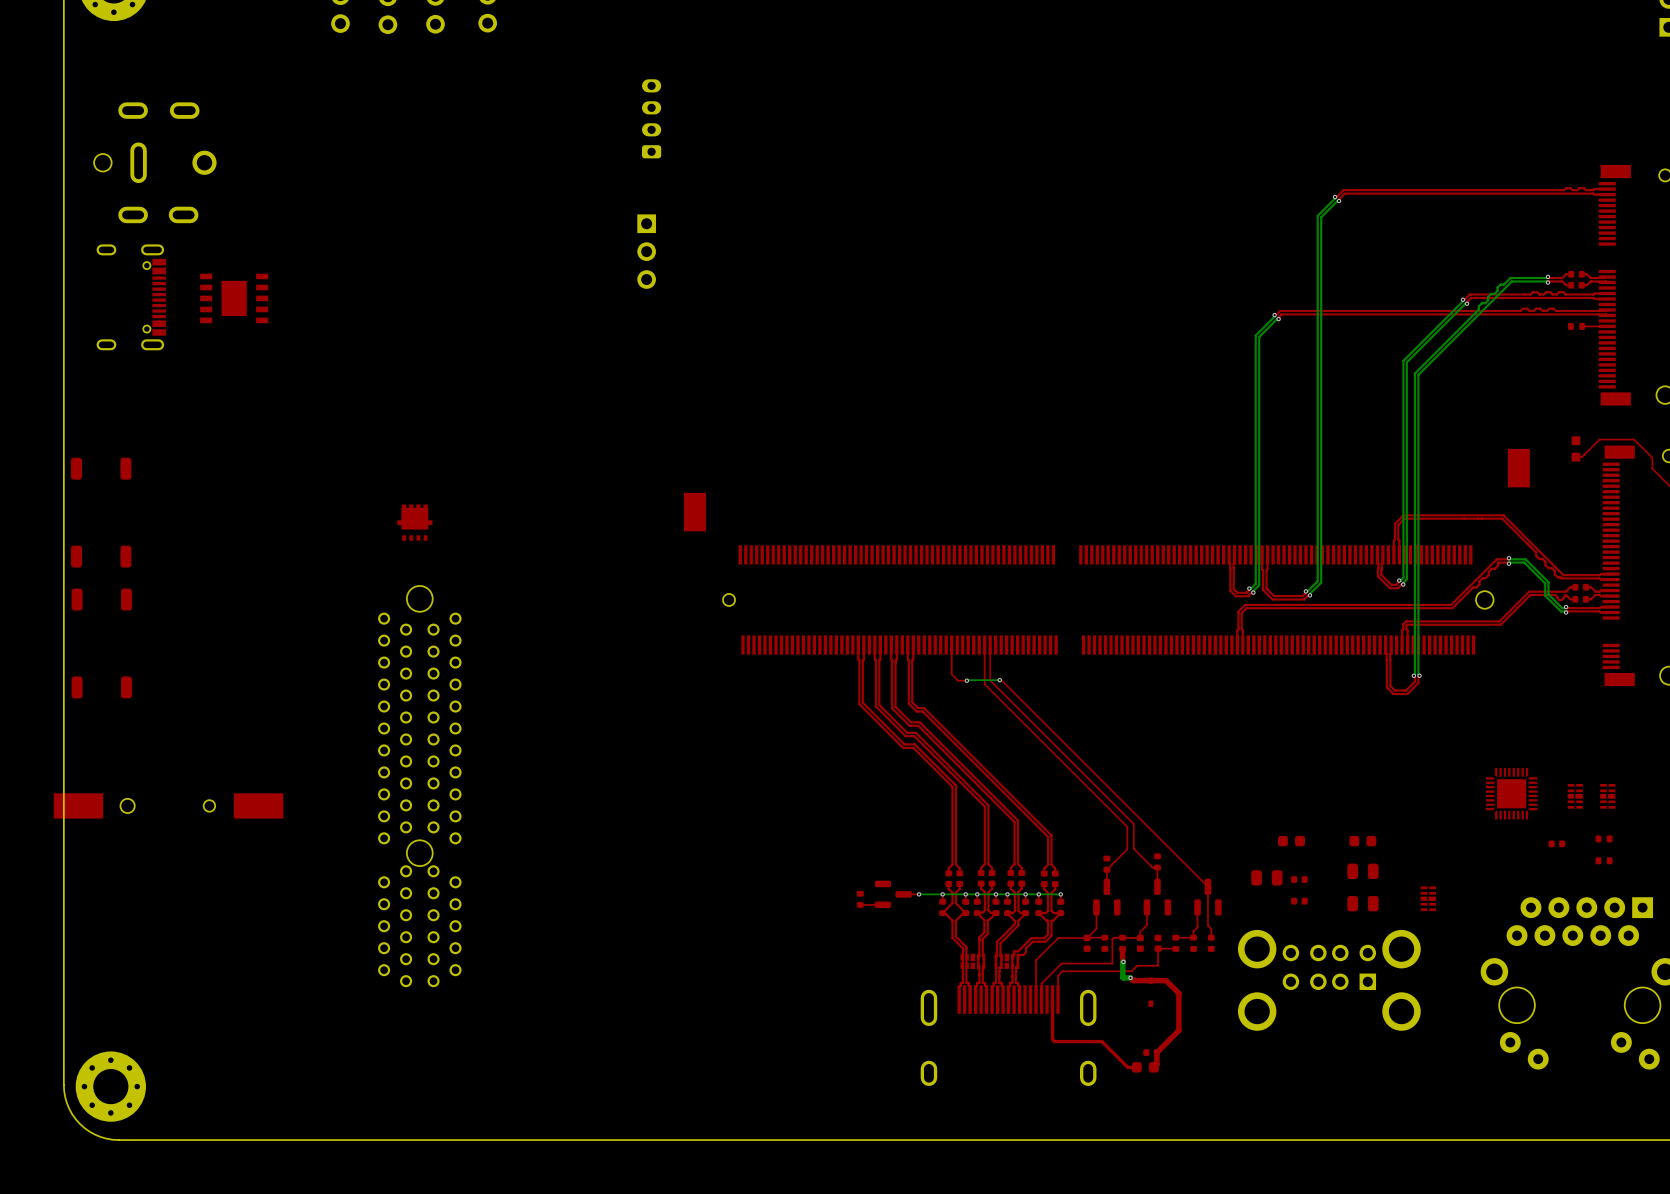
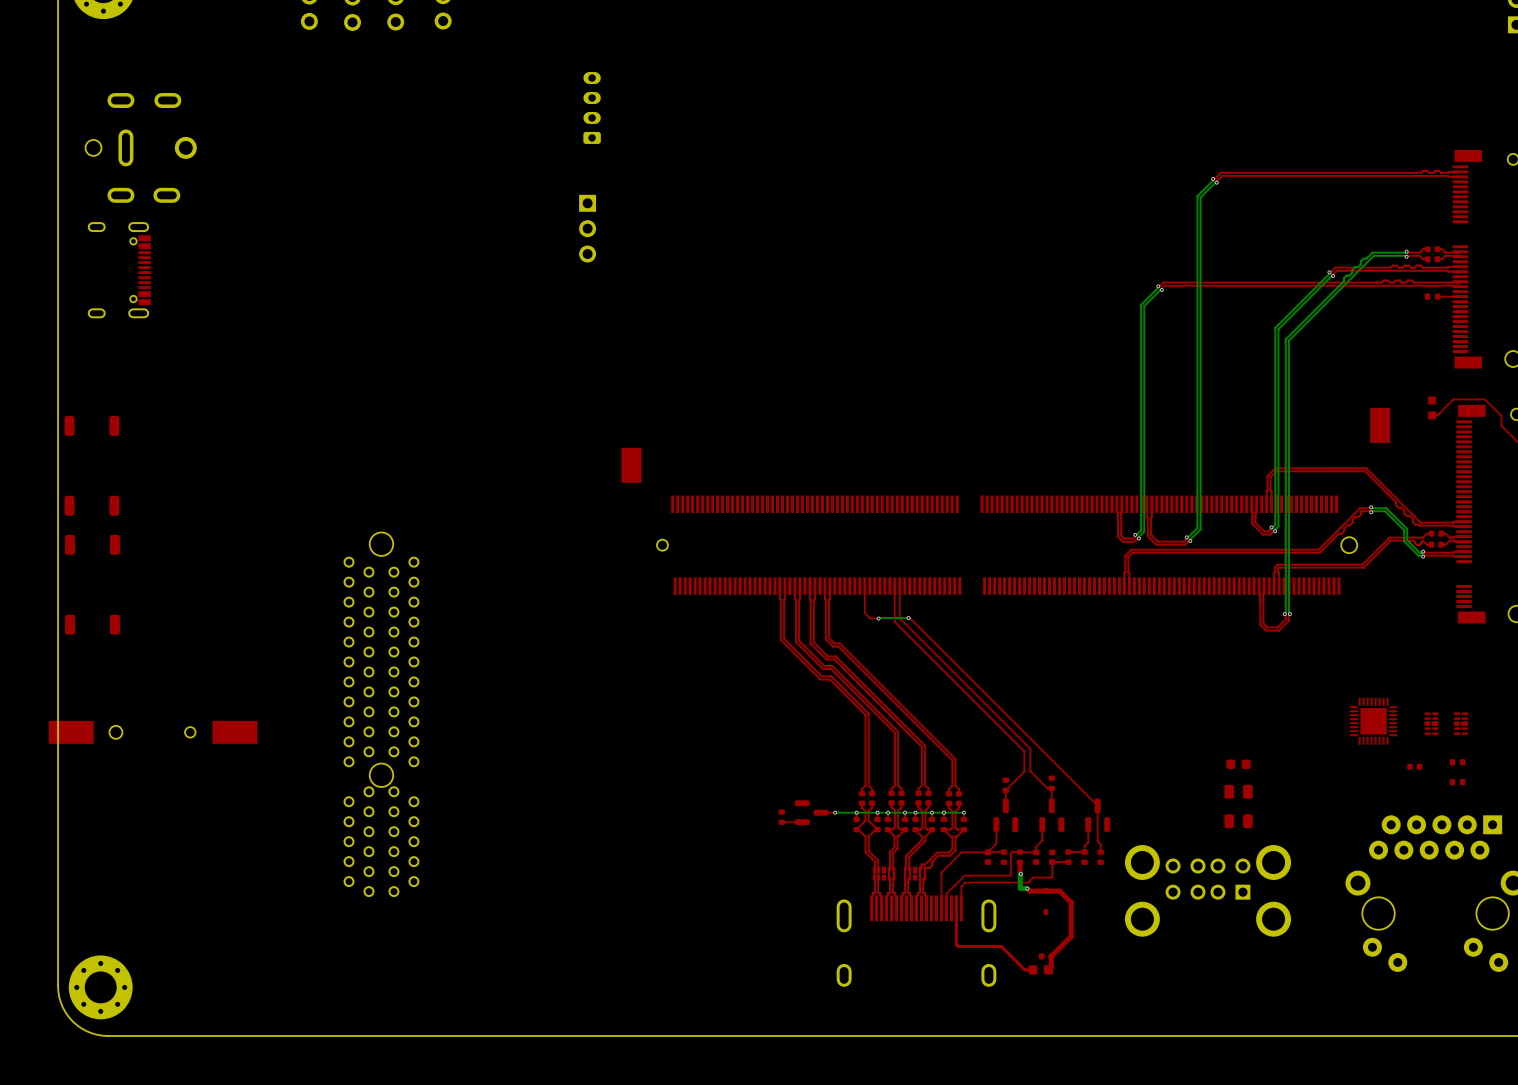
part: (234, 298) -> none
part: (414, 522) -> none
part: (1291, 841) -> none
part: (1266, 877) -> none
part: (1299, 879) -> none
part: (1428, 898) -> none
part: (1299, 901) -> none

